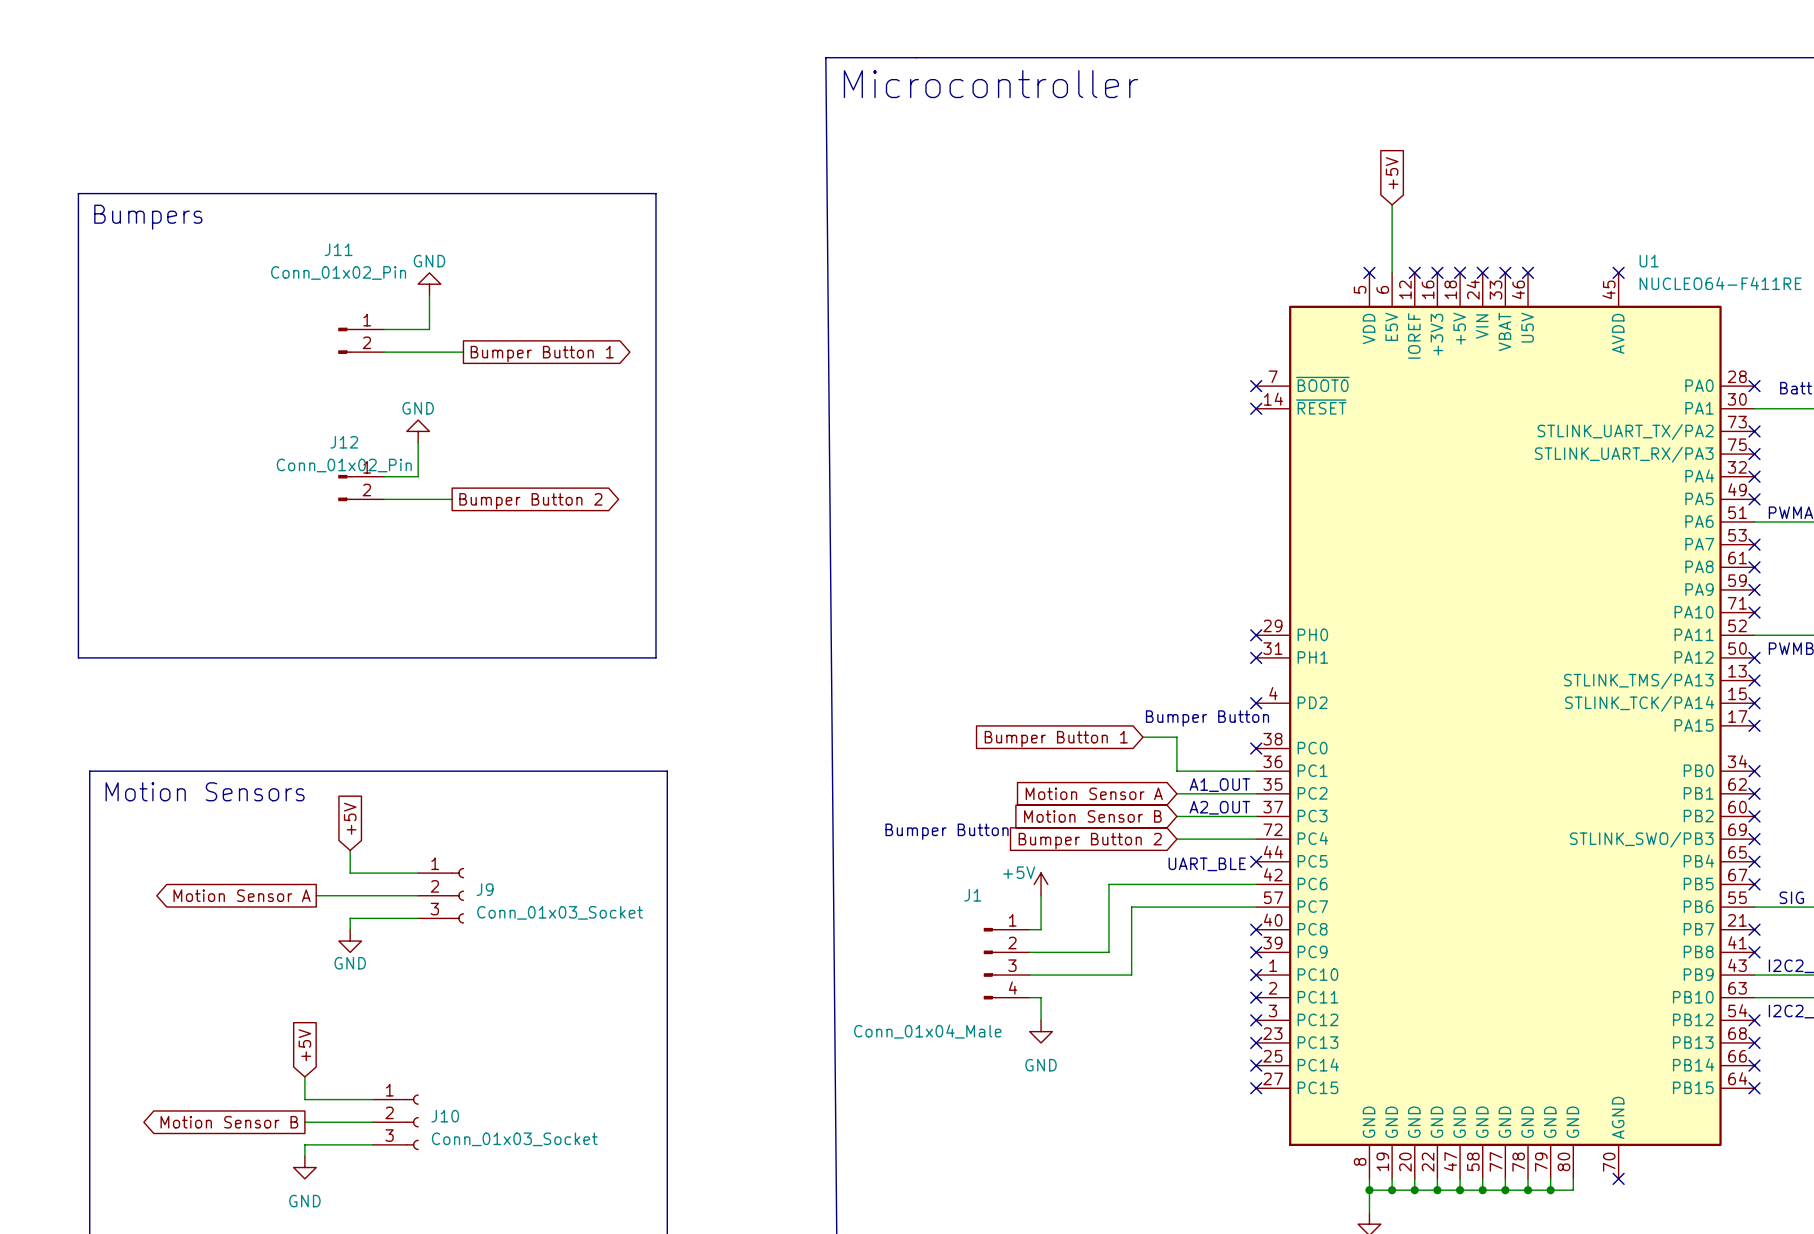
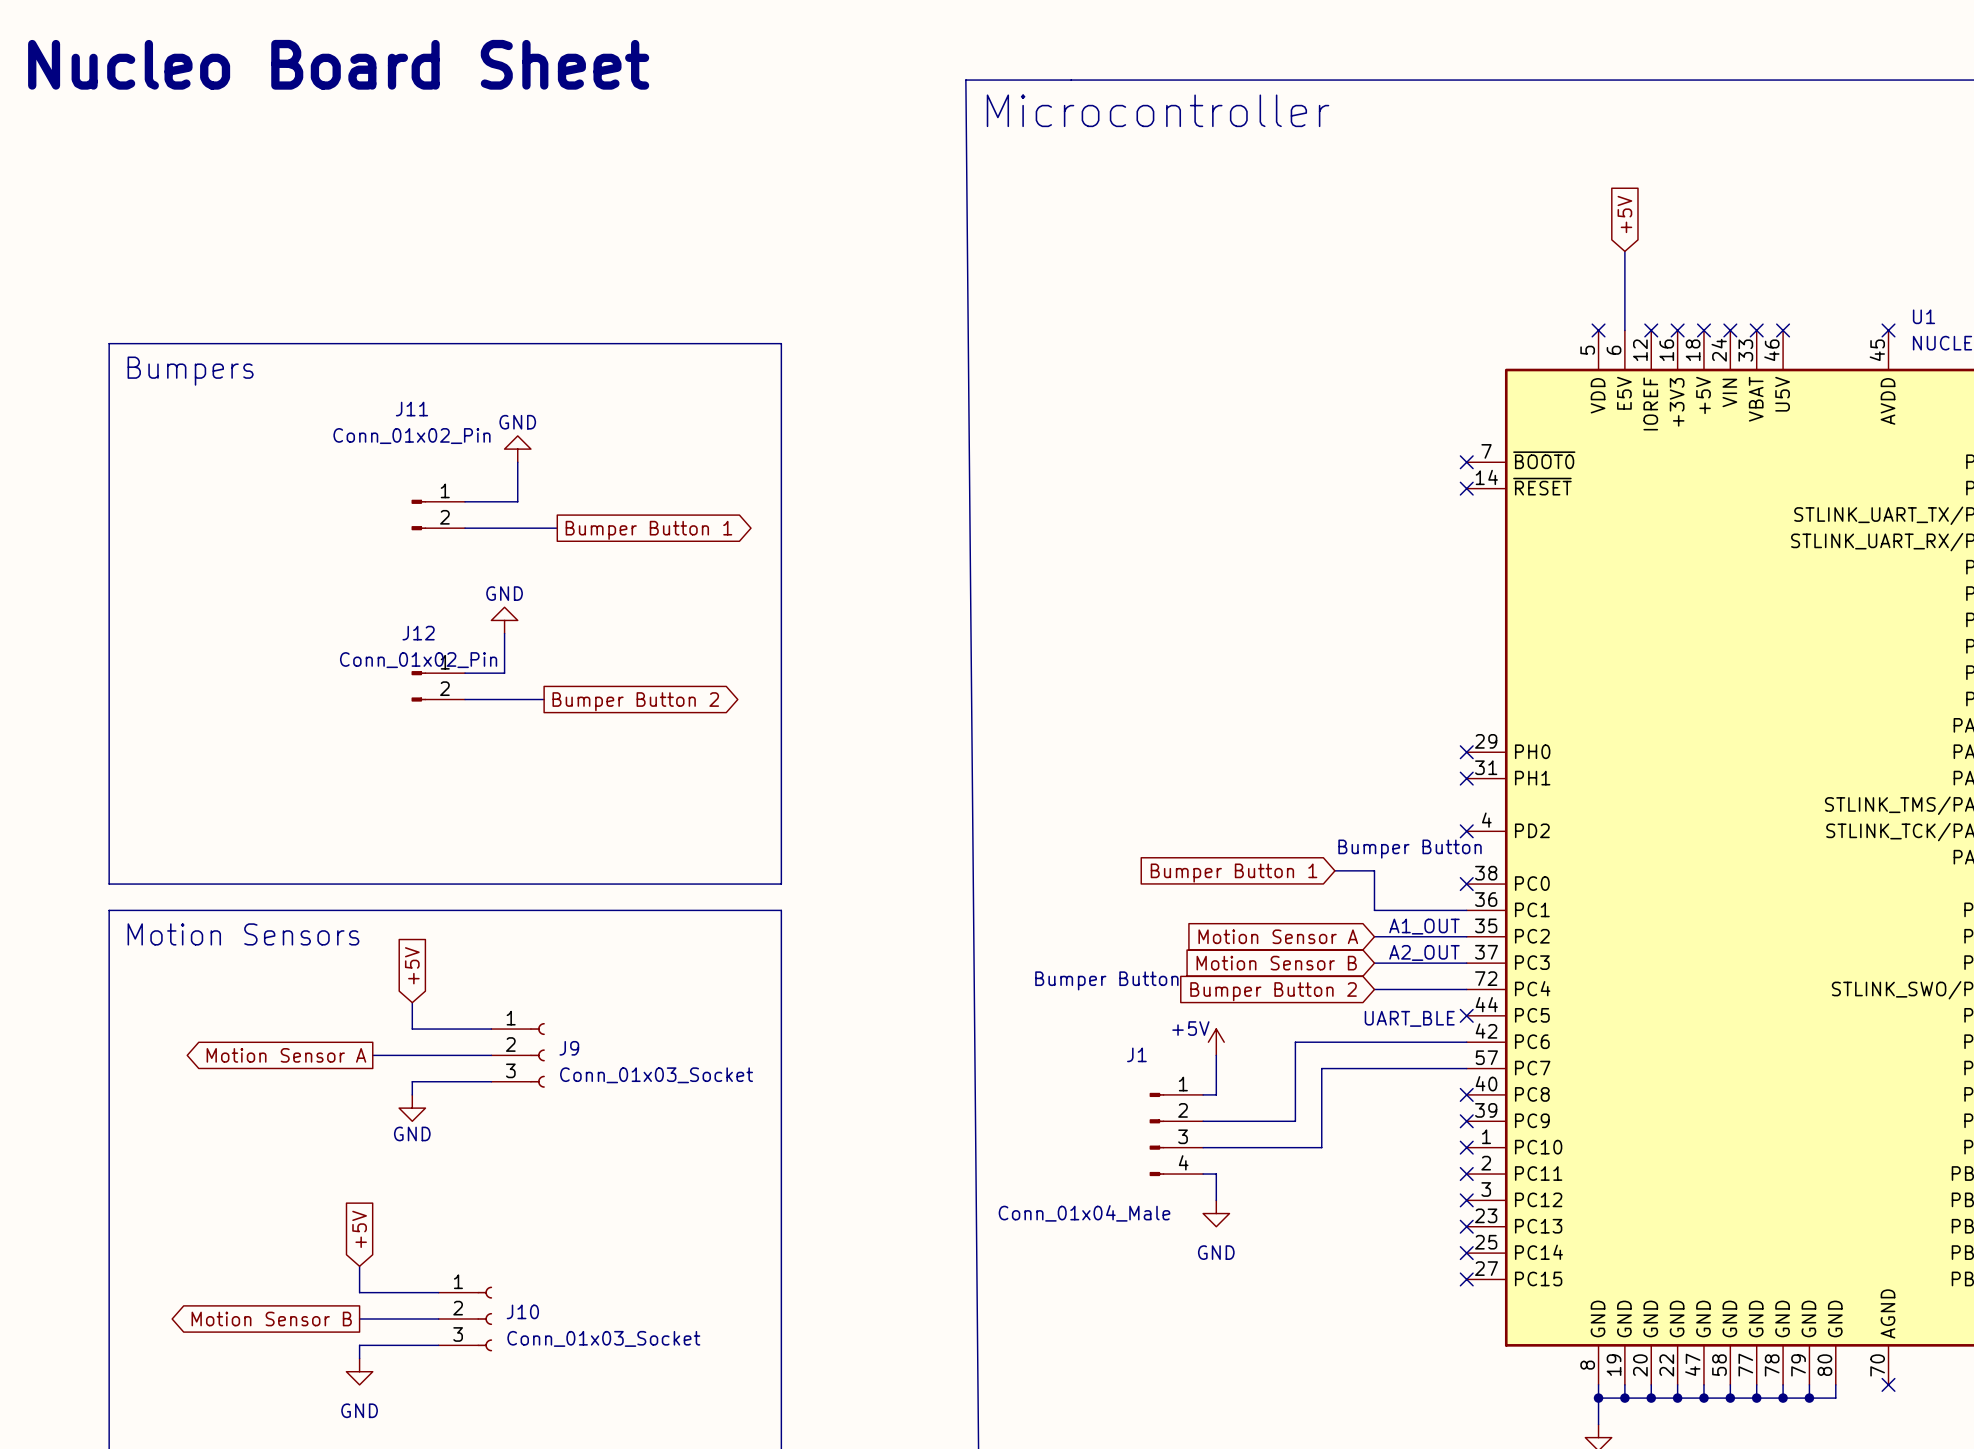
text: none -> Nucleo Board Sheet (338, 64)
line: (78, 193) (655, 193) (655, 657) (78, 657) (78, 193) -> (109, 343) (781, 343) (781, 884) (109, 884) (109, 343)
text position: Bumpers (148, 217) -> Bumpers (190, 371)
power symbol: GND (429, 284) -> none
wire: (429, 295) (429, 329) (384, 329) -> (517, 462) (517, 501) (465, 501)
J11 position: (361, 340) -> (438, 514)
wire: (384, 352) (463, 352) -> (465, 528) (557, 528)
global label position: Bumper Button 1 (542, 354) -> Bumper Button 1 (648, 530)
power symbol: none -> GND (517, 449)
power symbol: GND (418, 431) -> none
wire: (418, 442) (418, 476) (384, 476) -> (504, 633) (504, 673) (465, 673)
J12 position: (361, 488) -> (438, 686)
wire: (384, 499) (452, 499) -> (465, 699) (544, 699)
global label position: Bumper Button 2 (530, 501) -> Bumper Button 2 (635, 701)
power symbol: none -> GND (504, 620)

